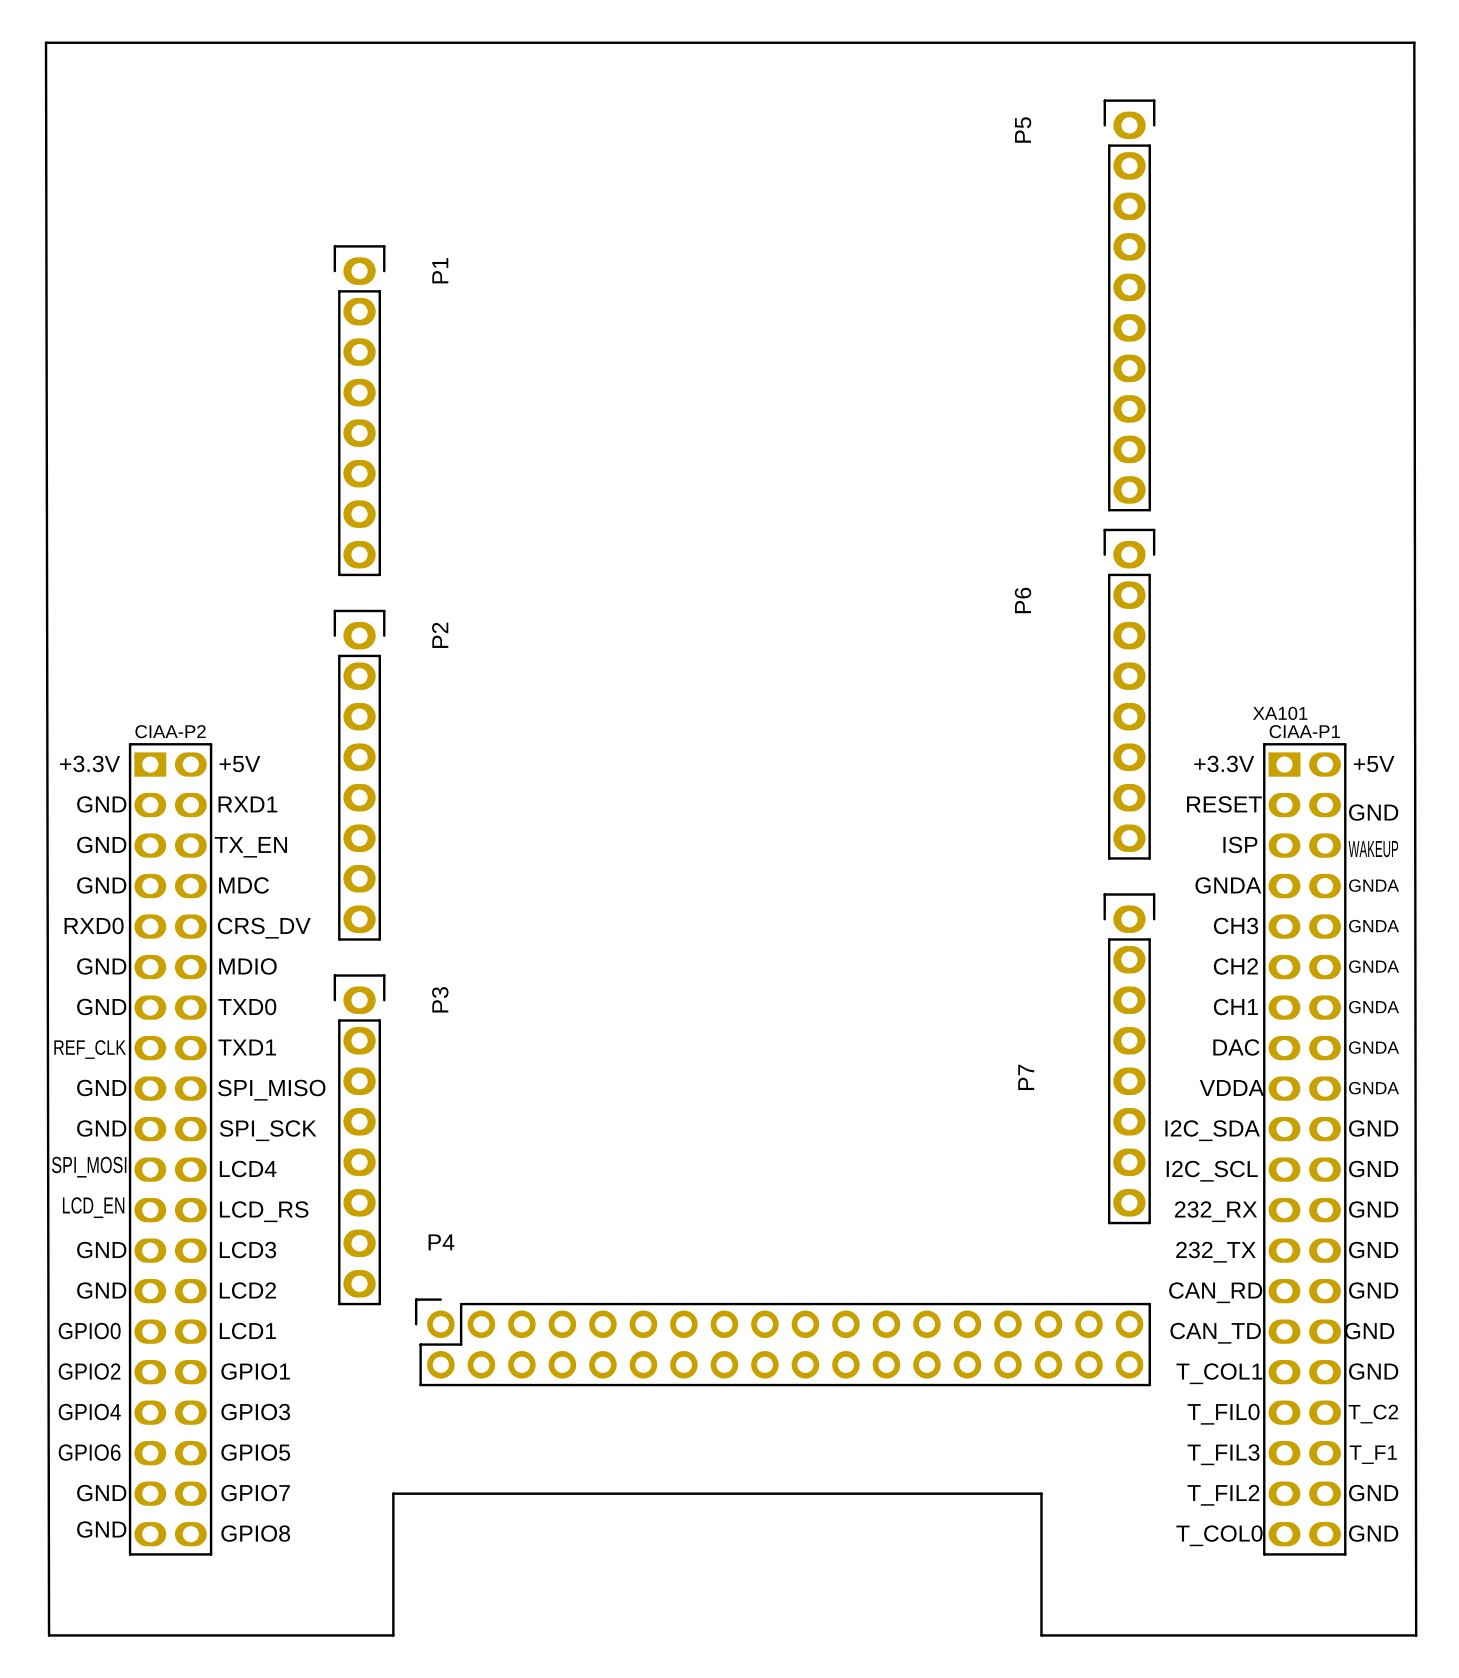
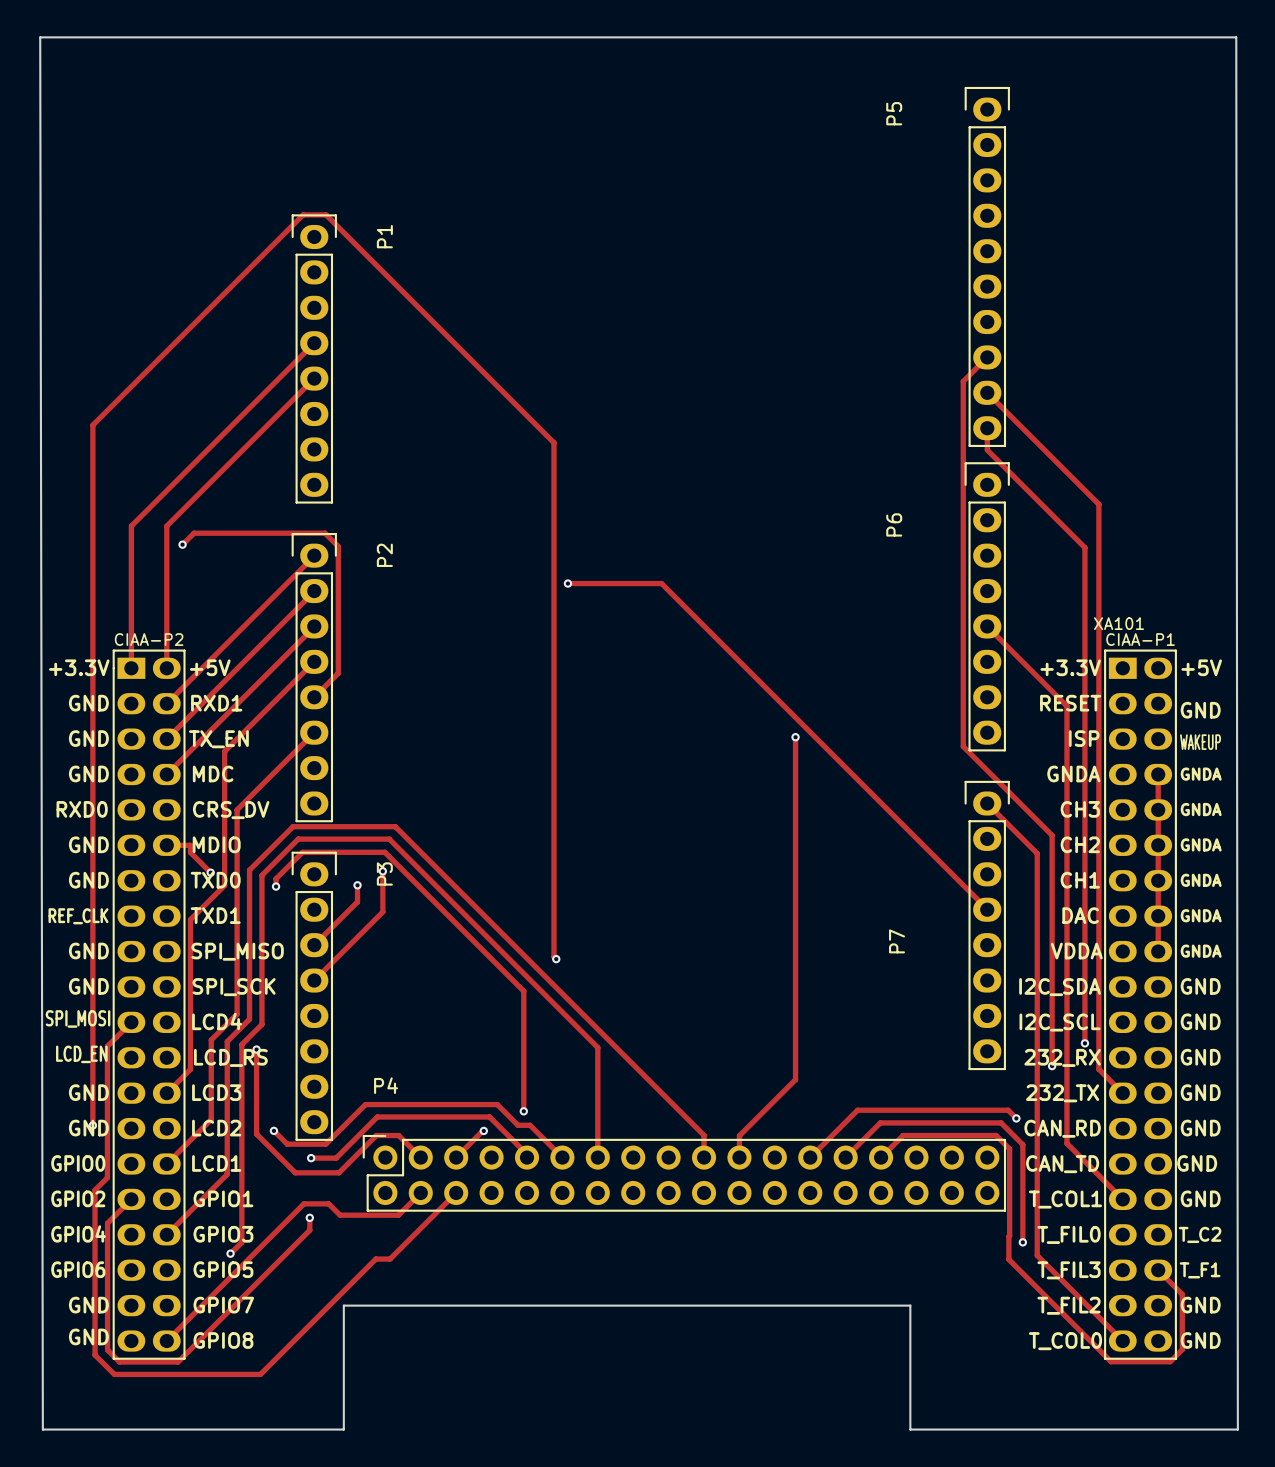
track: none -> (314, 343) (131, 526) (131, 668)
track: none -> (987, 357) (963, 381) (963, 746) (1052, 835) (1052, 1066)
track: none -> (314, 378) (166, 526) (166, 668)
track: none -> (987, 392) (1098, 504) (1098, 1069) (1122, 1093)
track: none -> (987, 428) (987, 450) (1084, 547) (1084, 1043)
track: none -> (182, 544) (194, 533) (325, 533) (338, 546) (338, 673) (314, 697)
via: none -> (182, 544)
track: none -> (314, 555) (166, 703)
track: none -> (567, 583) (661, 583) (987, 909)
via: none -> (567, 583)
track: none -> (314, 591) (166, 739)
track: none -> (314, 626) (166, 774)
track: none -> (987, 626) (1066, 706) (1066, 1143) (1122, 1199)
track: none -> (314, 661) (224, 751) (224, 885) (190, 919) (190, 1069) (166, 1093)
track: none -> (314, 732) (237, 809) (237, 1014) (211, 1039) (211, 1119) (166, 1163)
track: none -> (795, 737) (795, 1079) (739, 1135) (739, 1157)
via: none -> (795, 737)
track: none -> (1158, 774) (1158, 951)
track: none -> (987, 803) (1037, 853) (1037, 1255) (1122, 1341)
track: none -> (166, 845) (190, 845) (190, 852) (210, 872)
track: none -> (382, 871) (382, 911) (314, 980)
via: none -> (382, 871)
via: none -> (210, 872)
track: none -> (357, 885) (357, 901) (314, 945)
via: none -> (357, 885)
track: none -> (276, 886) (276, 878) (302, 852) (384, 852) (523, 991) (523, 1111)
via: none -> (276, 886)
track: none -> (556, 959) (553, 956) (553, 442) (326, 214) (303, 214) (92, 425) (92, 1125)
via: none -> (556, 959)
track: none -> (131, 1022) (107, 1046) (107, 1177) (95, 1190) (95, 1355) (114, 1374) (260, 1374) (375, 1259) (390, 1259) (456, 1192)
via: none -> (1084, 1043)
track: none -> (256, 1049) (256, 1134) (295, 1172) (339, 1172) (376, 1135) (398, 1135) (420, 1157)
via: none -> (256, 1049)
via: none -> (1052, 1066)
via: none -> (523, 1111)
track: none -> (1016, 1118) (1008, 1110) (857, 1110) (810, 1157)
via: none -> (1016, 1118)
via: none -> (92, 1125)
track: none -> (273, 1130) (287, 1144) (325, 1144) (365, 1104) (497, 1104) (518, 1125) (530, 1125) (562, 1157)
via: none -> (273, 1130)
track: none -> (483, 1130) (456, 1157)
via: none -> (483, 1130)
via: none -> (311, 1158)
track: none -> (527, 1157) (527, 1154) (489, 1117) (377, 1117) (336, 1158) (311, 1158)
track: none -> (597, 1157) (597, 1047) (389, 839) (298, 839) (261, 875) (261, 1024) (241, 1044) (241, 1242) (230, 1253)
track: none -> (704, 1157) (704, 1135) (395, 826) (293, 826) (249, 870) (249, 1019) (227, 1041) (227, 1174) (166, 1234)
track: none -> (845, 1157) (880, 1122) (1001, 1122) (1022, 1144) (1022, 1242)
track: none -> (881, 1157) (903, 1135) (996, 1135) (1009, 1149) (1008, 1259) (1111, 1361) (1170, 1361) (1182, 1349) (1182, 1294) (1158, 1270)
track: none -> (420, 1192) (398, 1215) (340, 1215) (328, 1203) (303, 1203) (166, 1341)
track: none -> (131, 1199) (107, 1223) (107, 1350) (119, 1362) (178, 1362) (309, 1230) (309, 1217)
via: none -> (309, 1217)
via: none -> (1022, 1242)
via: none -> (230, 1253)

